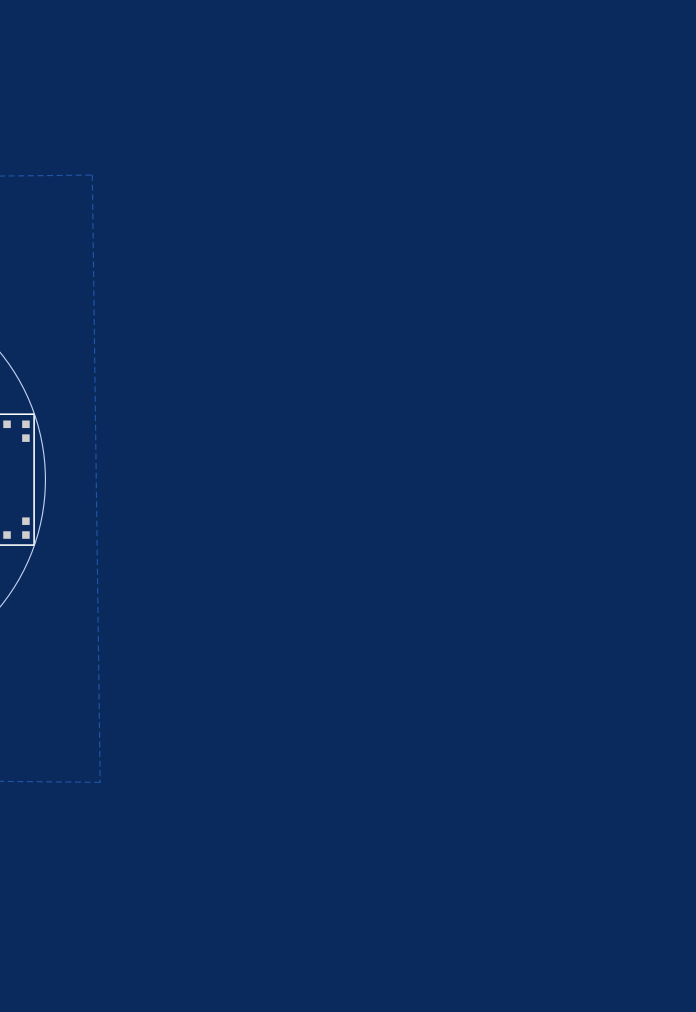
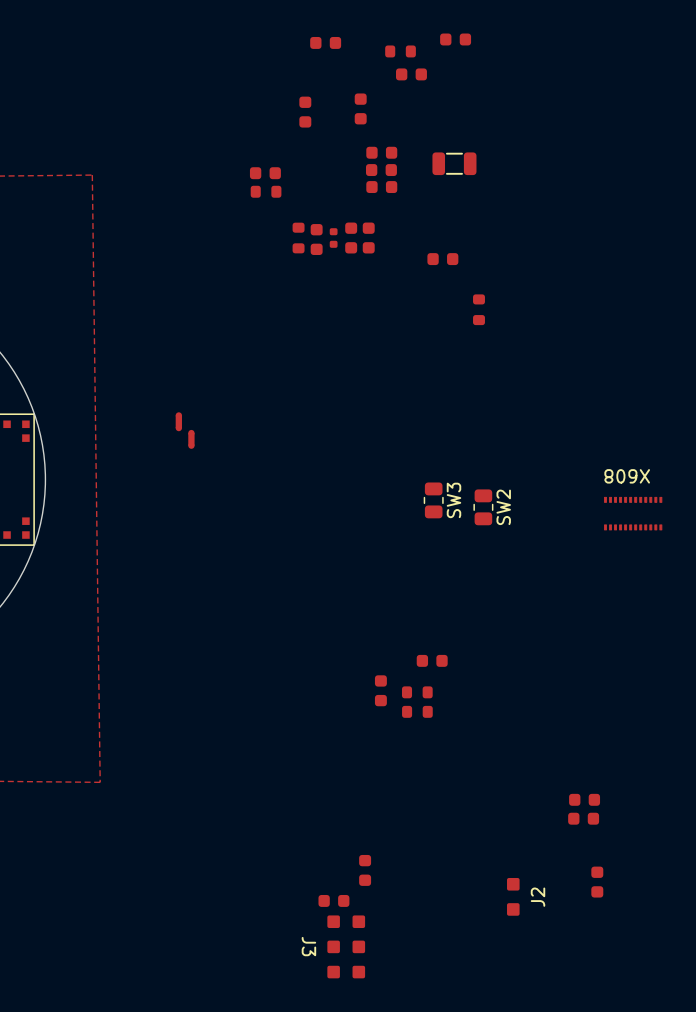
part: none -> (455, 39)
part: none -> (325, 42)
part: none -> (400, 51)
part: none -> (411, 74)
part: none -> (360, 108)
part: none -> (305, 112)
part: none -> (381, 152)
part: none -> (454, 163)
part: none -> (381, 170)
part: none -> (265, 173)
part: none -> (381, 187)
part: none -> (266, 191)
part: none -> (298, 238)
part: none -> (333, 238)
part: none -> (351, 238)
part: none -> (368, 238)
part: none -> (316, 239)
part: none -> (442, 259)
part: none -> (479, 309)
part: none -> (178, 421)
part: none -> (191, 439)
SW3: none -> (433, 500)
SW2: none -> (483, 507)
X608: none -> (633, 513)
part: none -> (432, 660)
part: none -> (380, 690)
part: none -> (417, 692)
part: none -> (417, 711)
part: none -> (584, 799)
part: none -> (583, 818)
part: none -> (365, 870)
part: none -> (597, 882)
J2: none -> (513, 896)
part: none -> (333, 900)
J3: none -> (346, 946)

